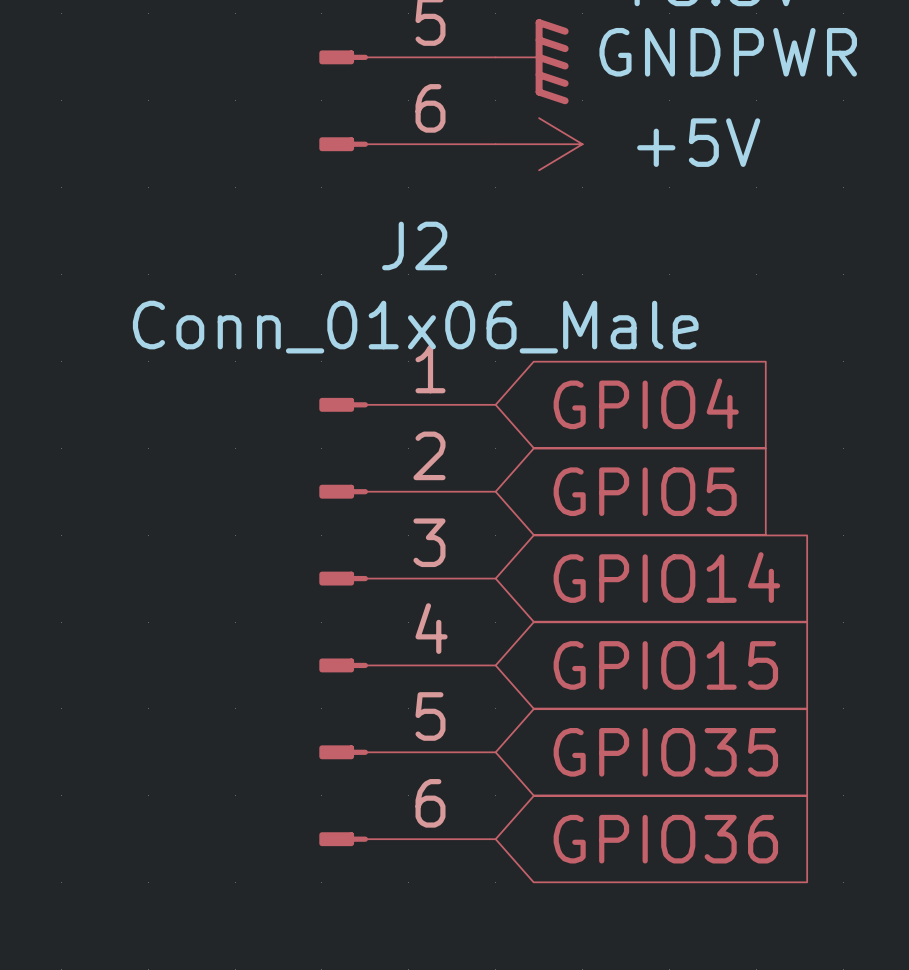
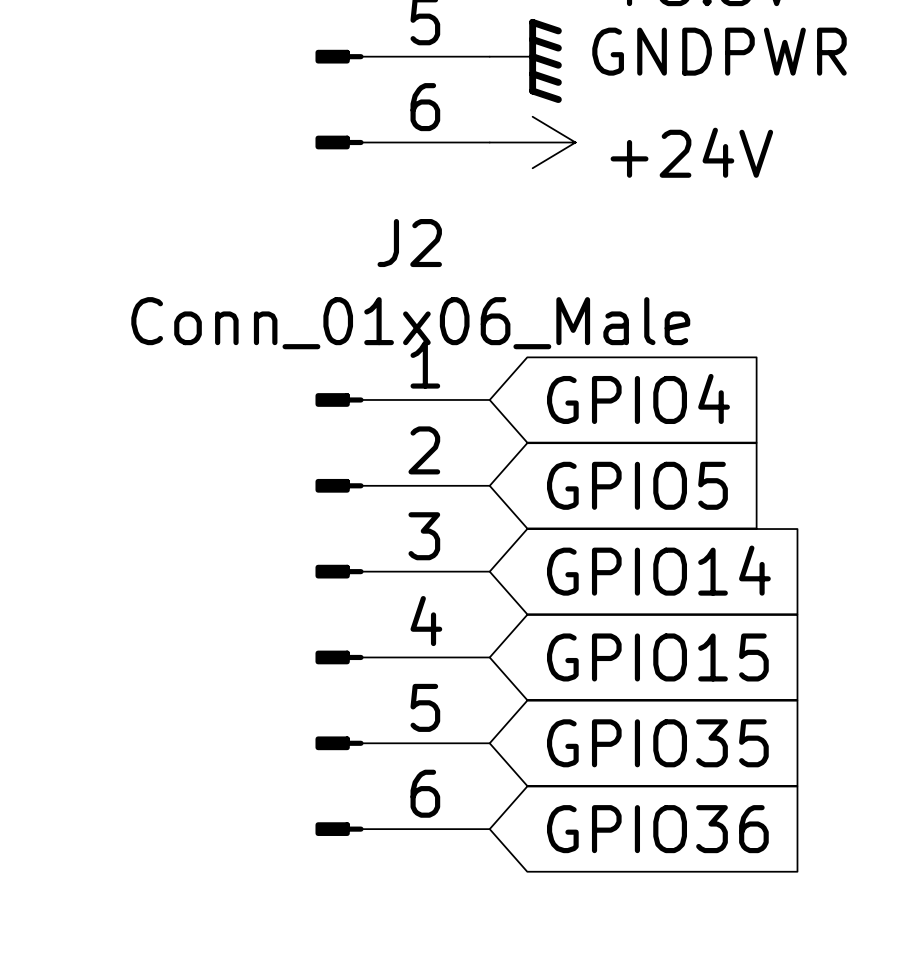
power symbol: +5V (539, 144) -> +24V (532, 142)

